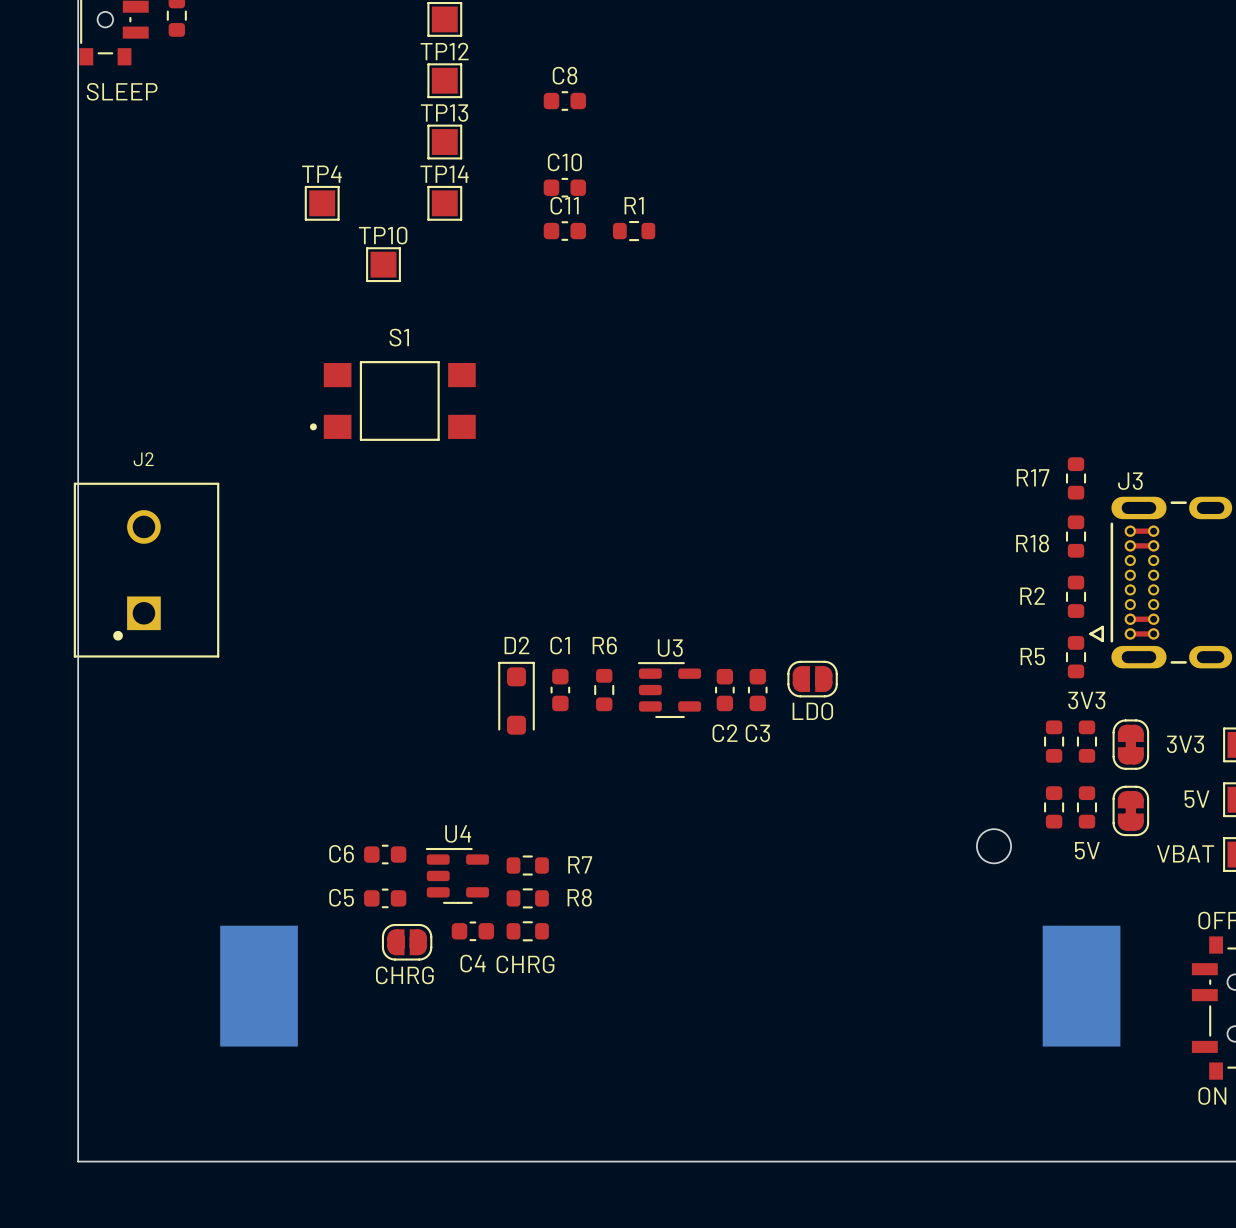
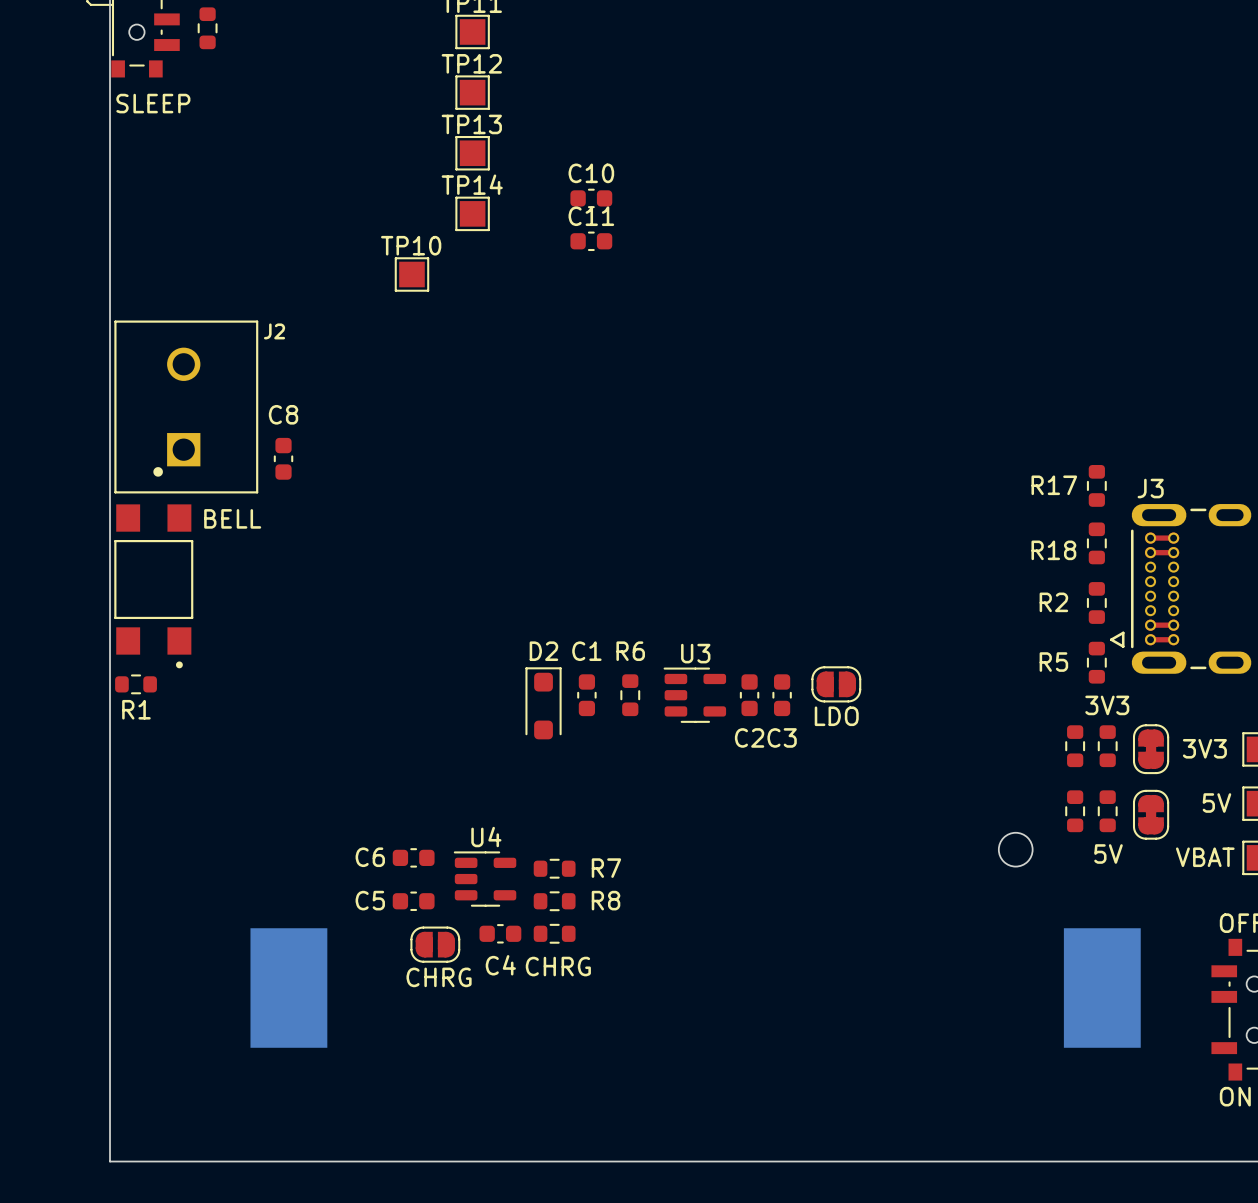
C8 rotation: 0° (564, 101) -> 90° clockwise (283, 458)
C8 position: (564, 101) -> (283, 458)
TP4: (322, 203) -> none
R1 name position: R1 (634, 205) -> R1 (136, 709)
R1 position: (634, 231) -> (136, 684)
S1: (392, 400) -> none
J2 name position: J2 (143, 459) -> J2 (274, 331)
J2 position: (146, 570) -> (186, 406)
part: none -> (153, 586)

